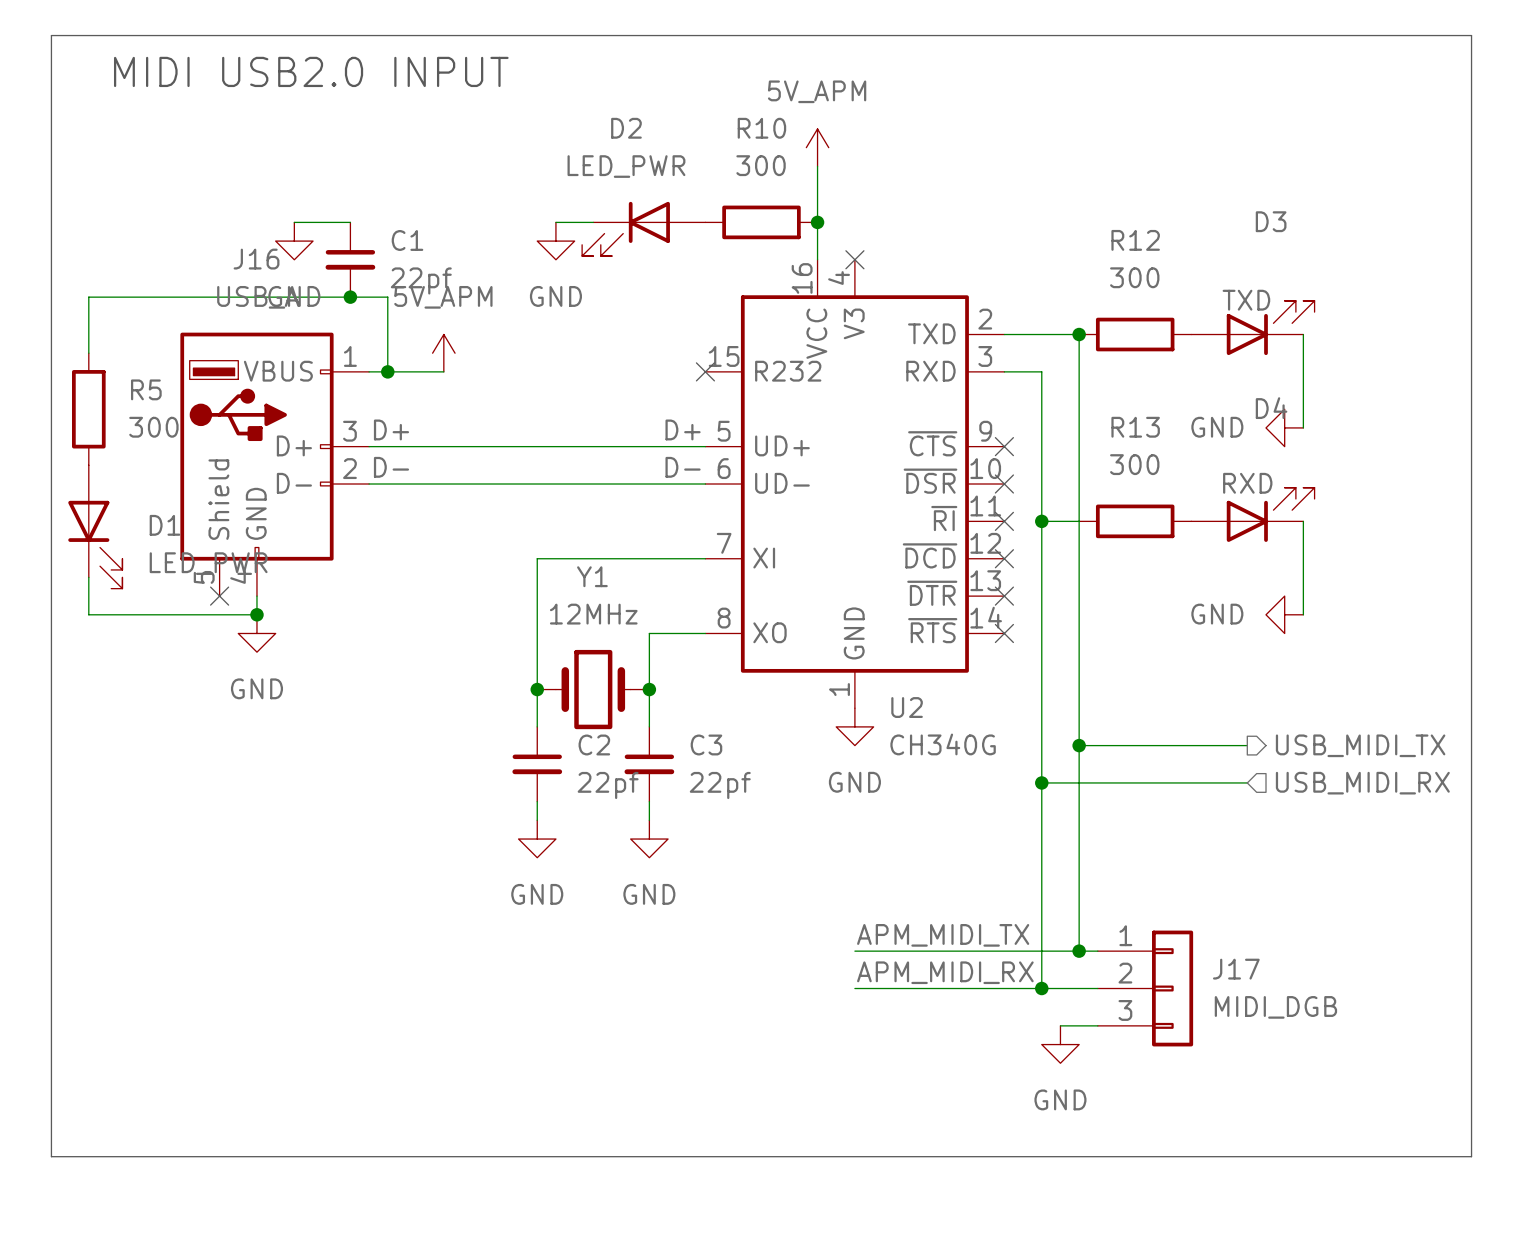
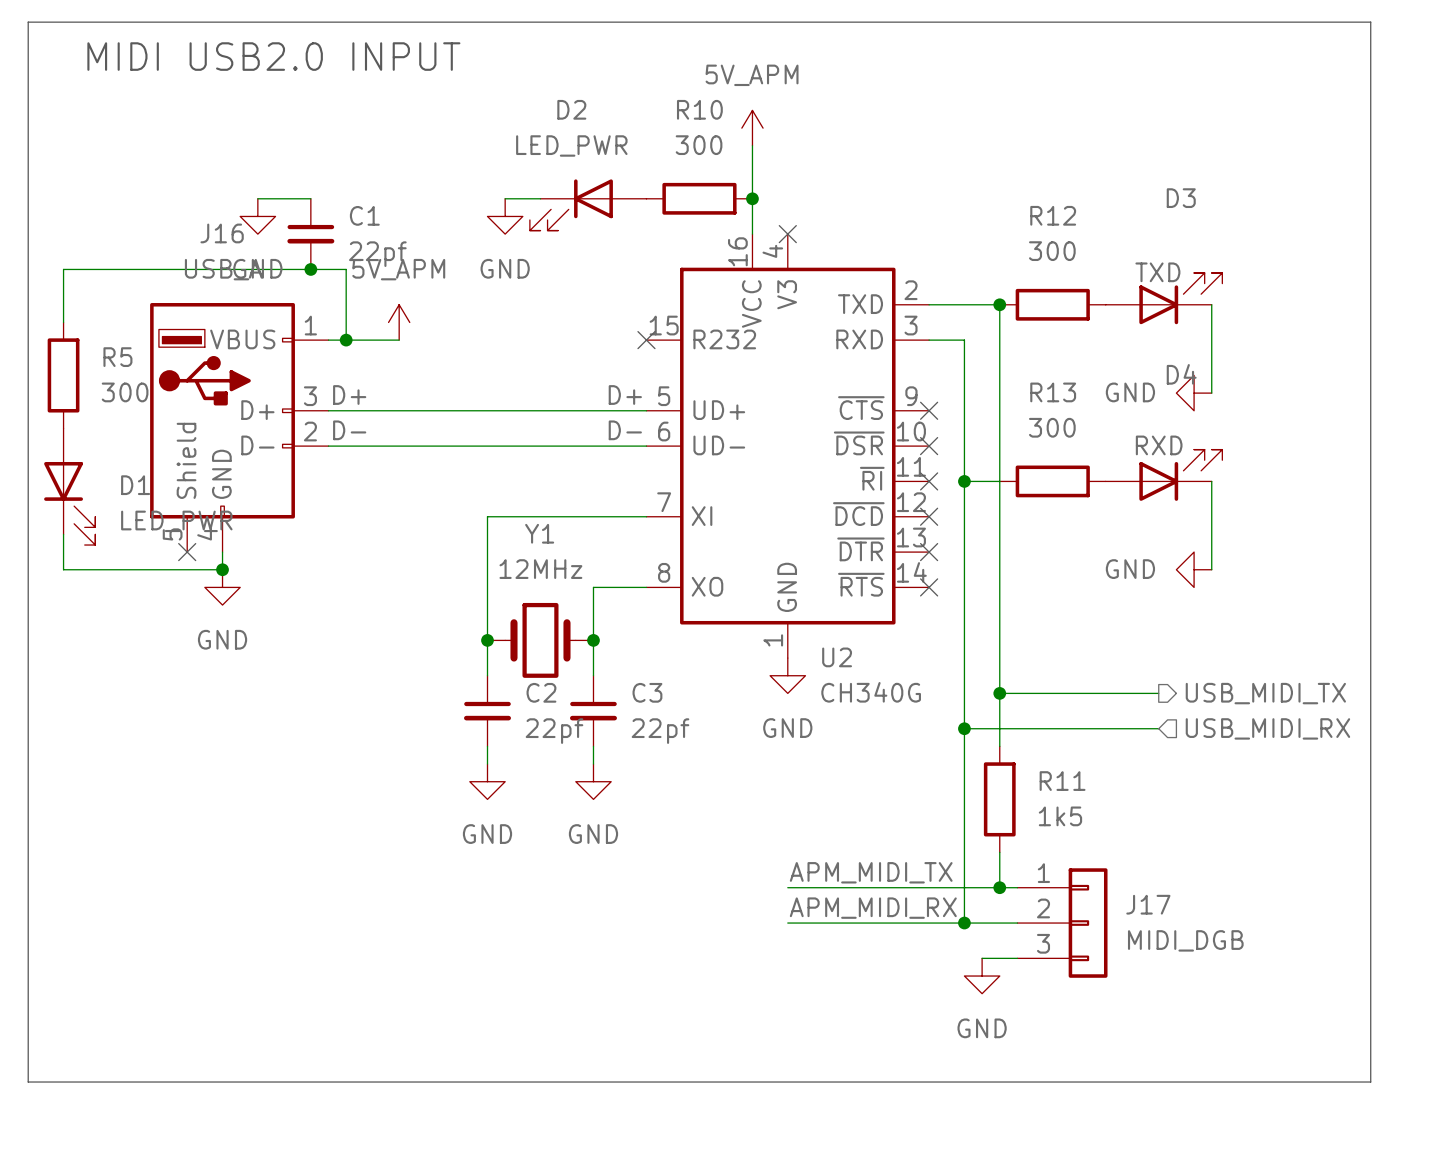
wire: (1079, 801) (1079, 913) -> none
R11: none -> 1k5 (999, 799)

